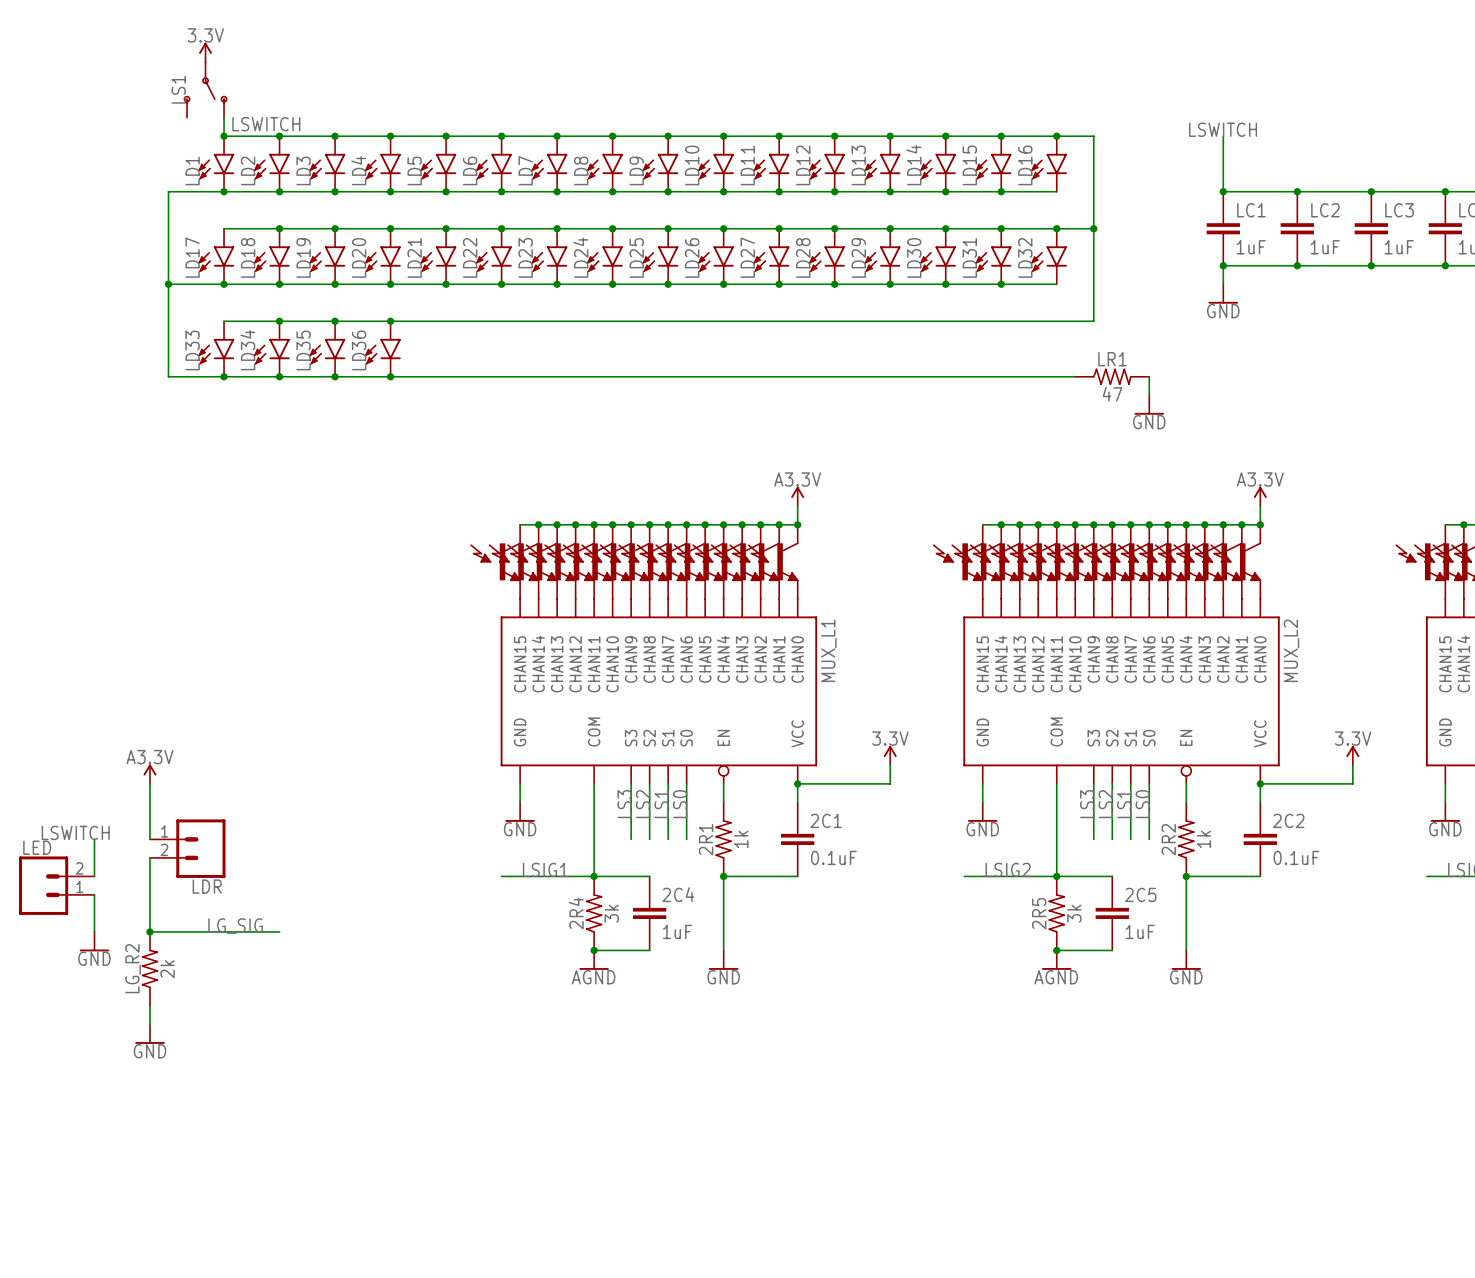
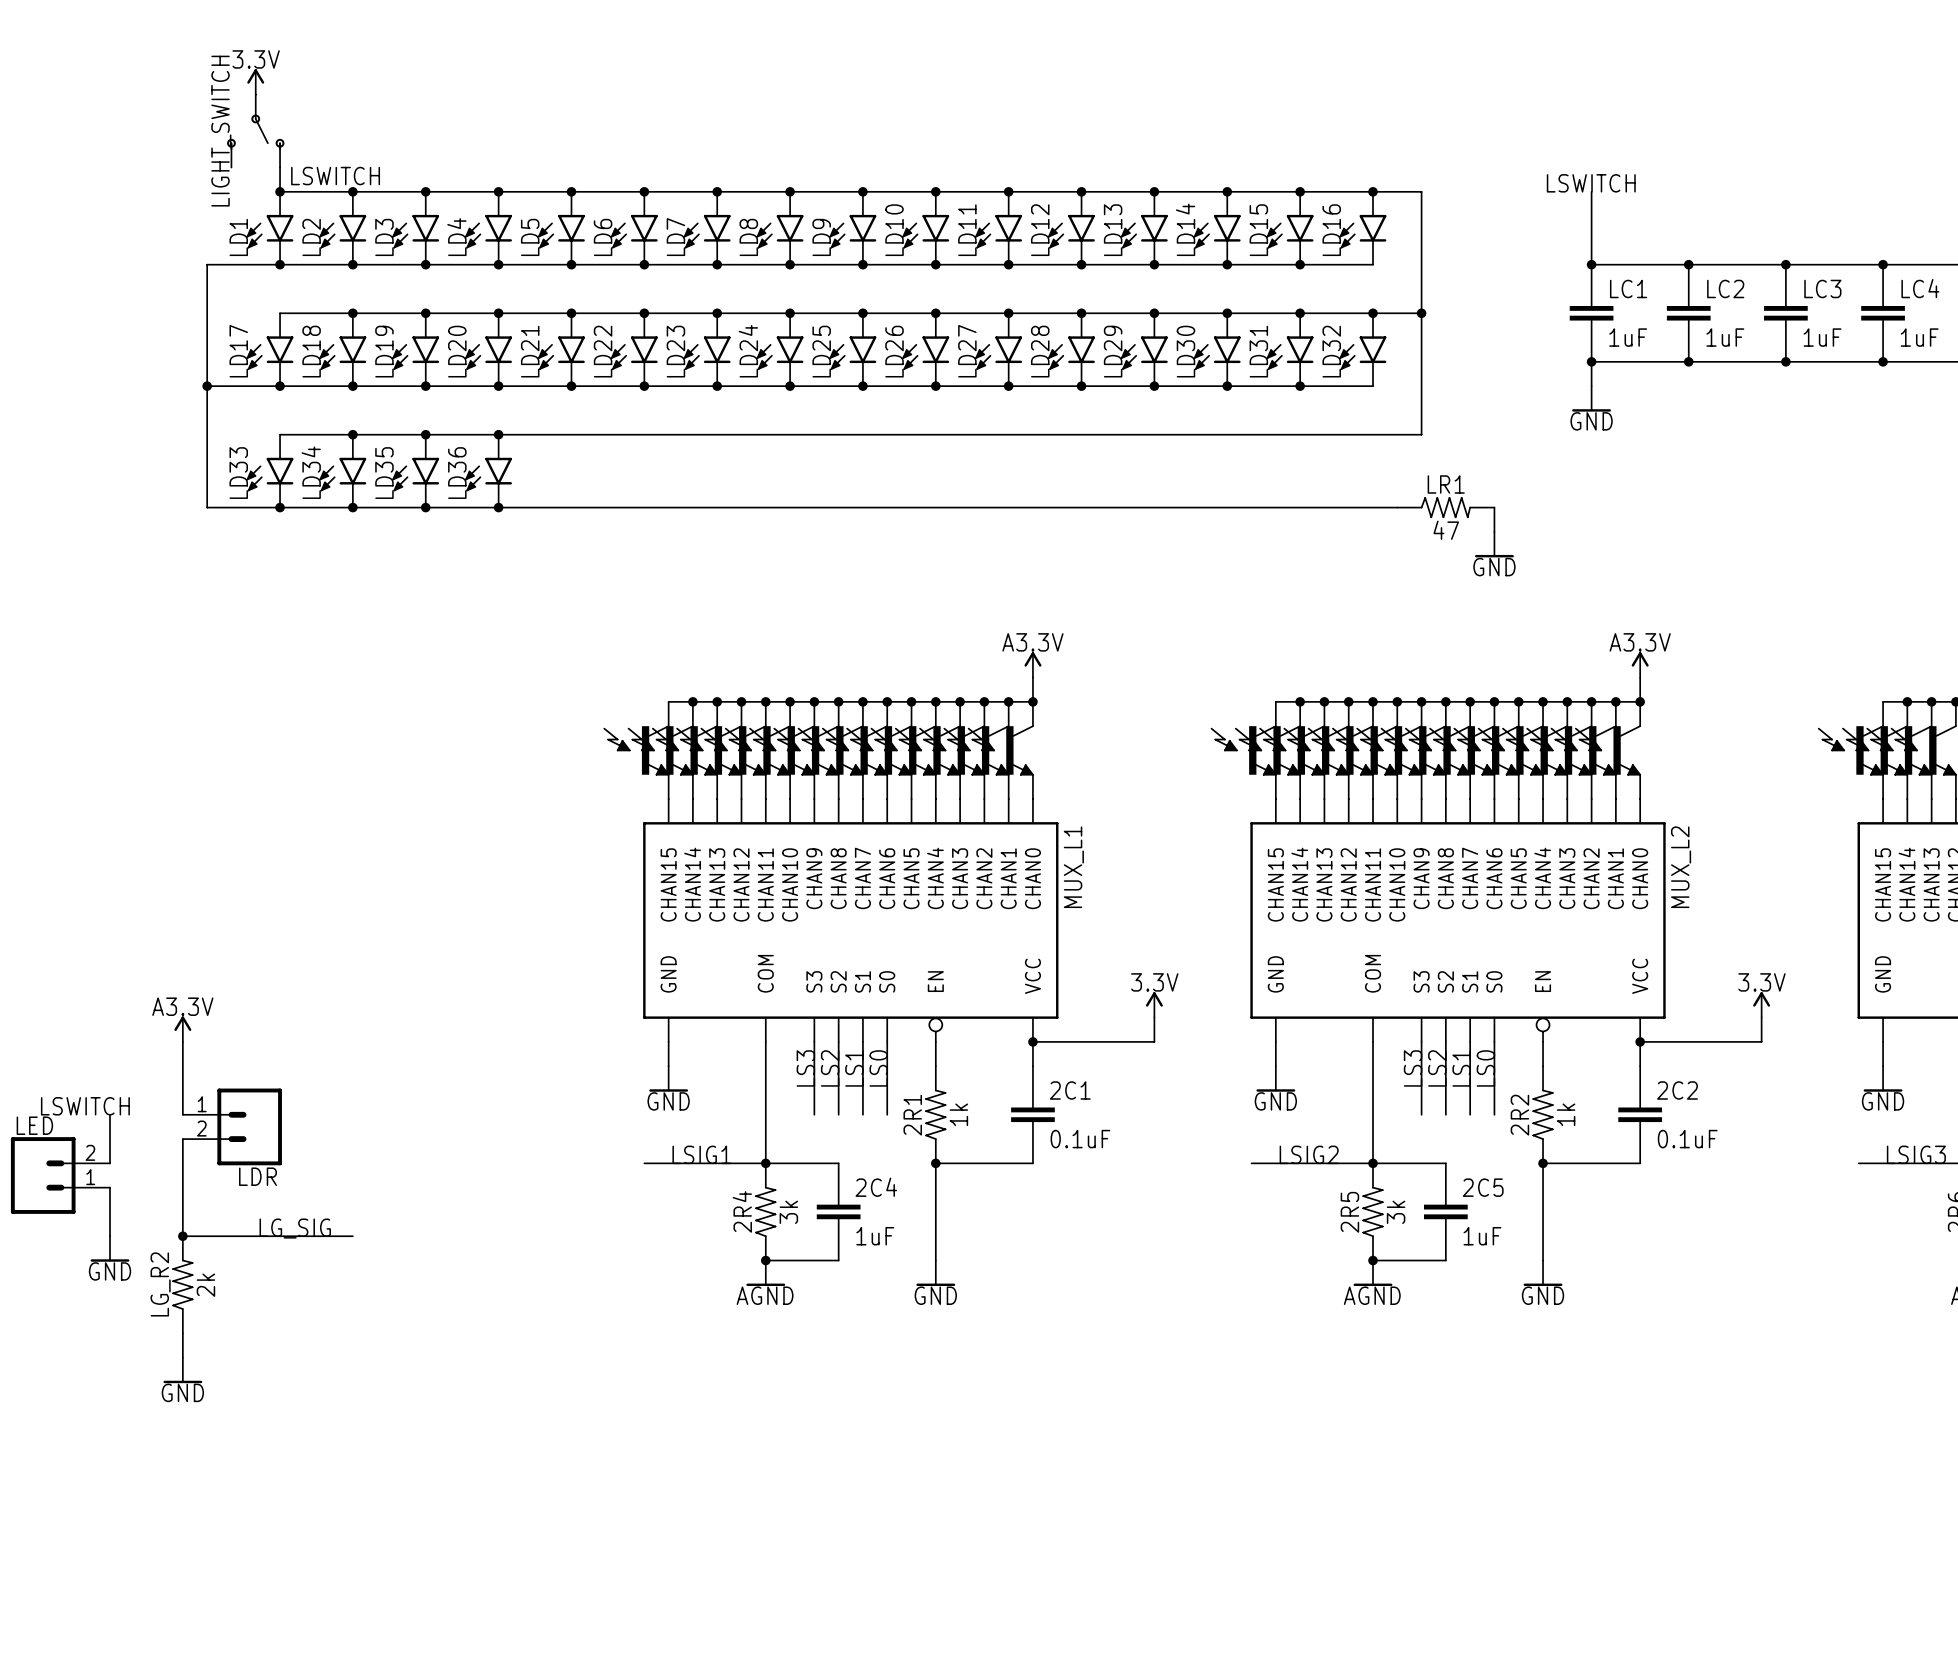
LS1 name: LS1 (178, 89) -> LIGHT_SWITCH (221, 131)

